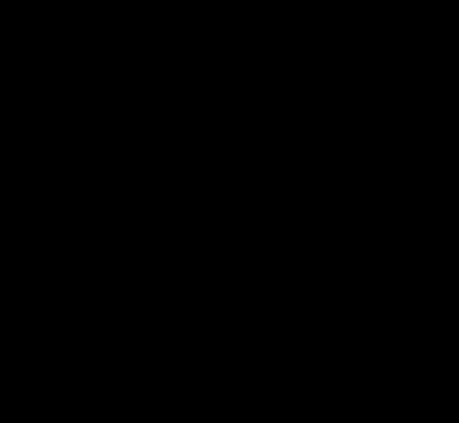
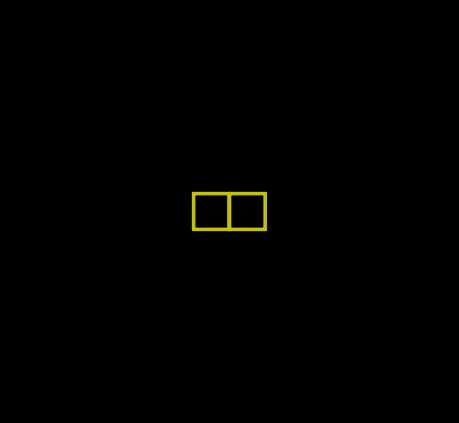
board edge: none -> (193, 193) (265, 193) (265, 229) (193, 229) (193, 193)

